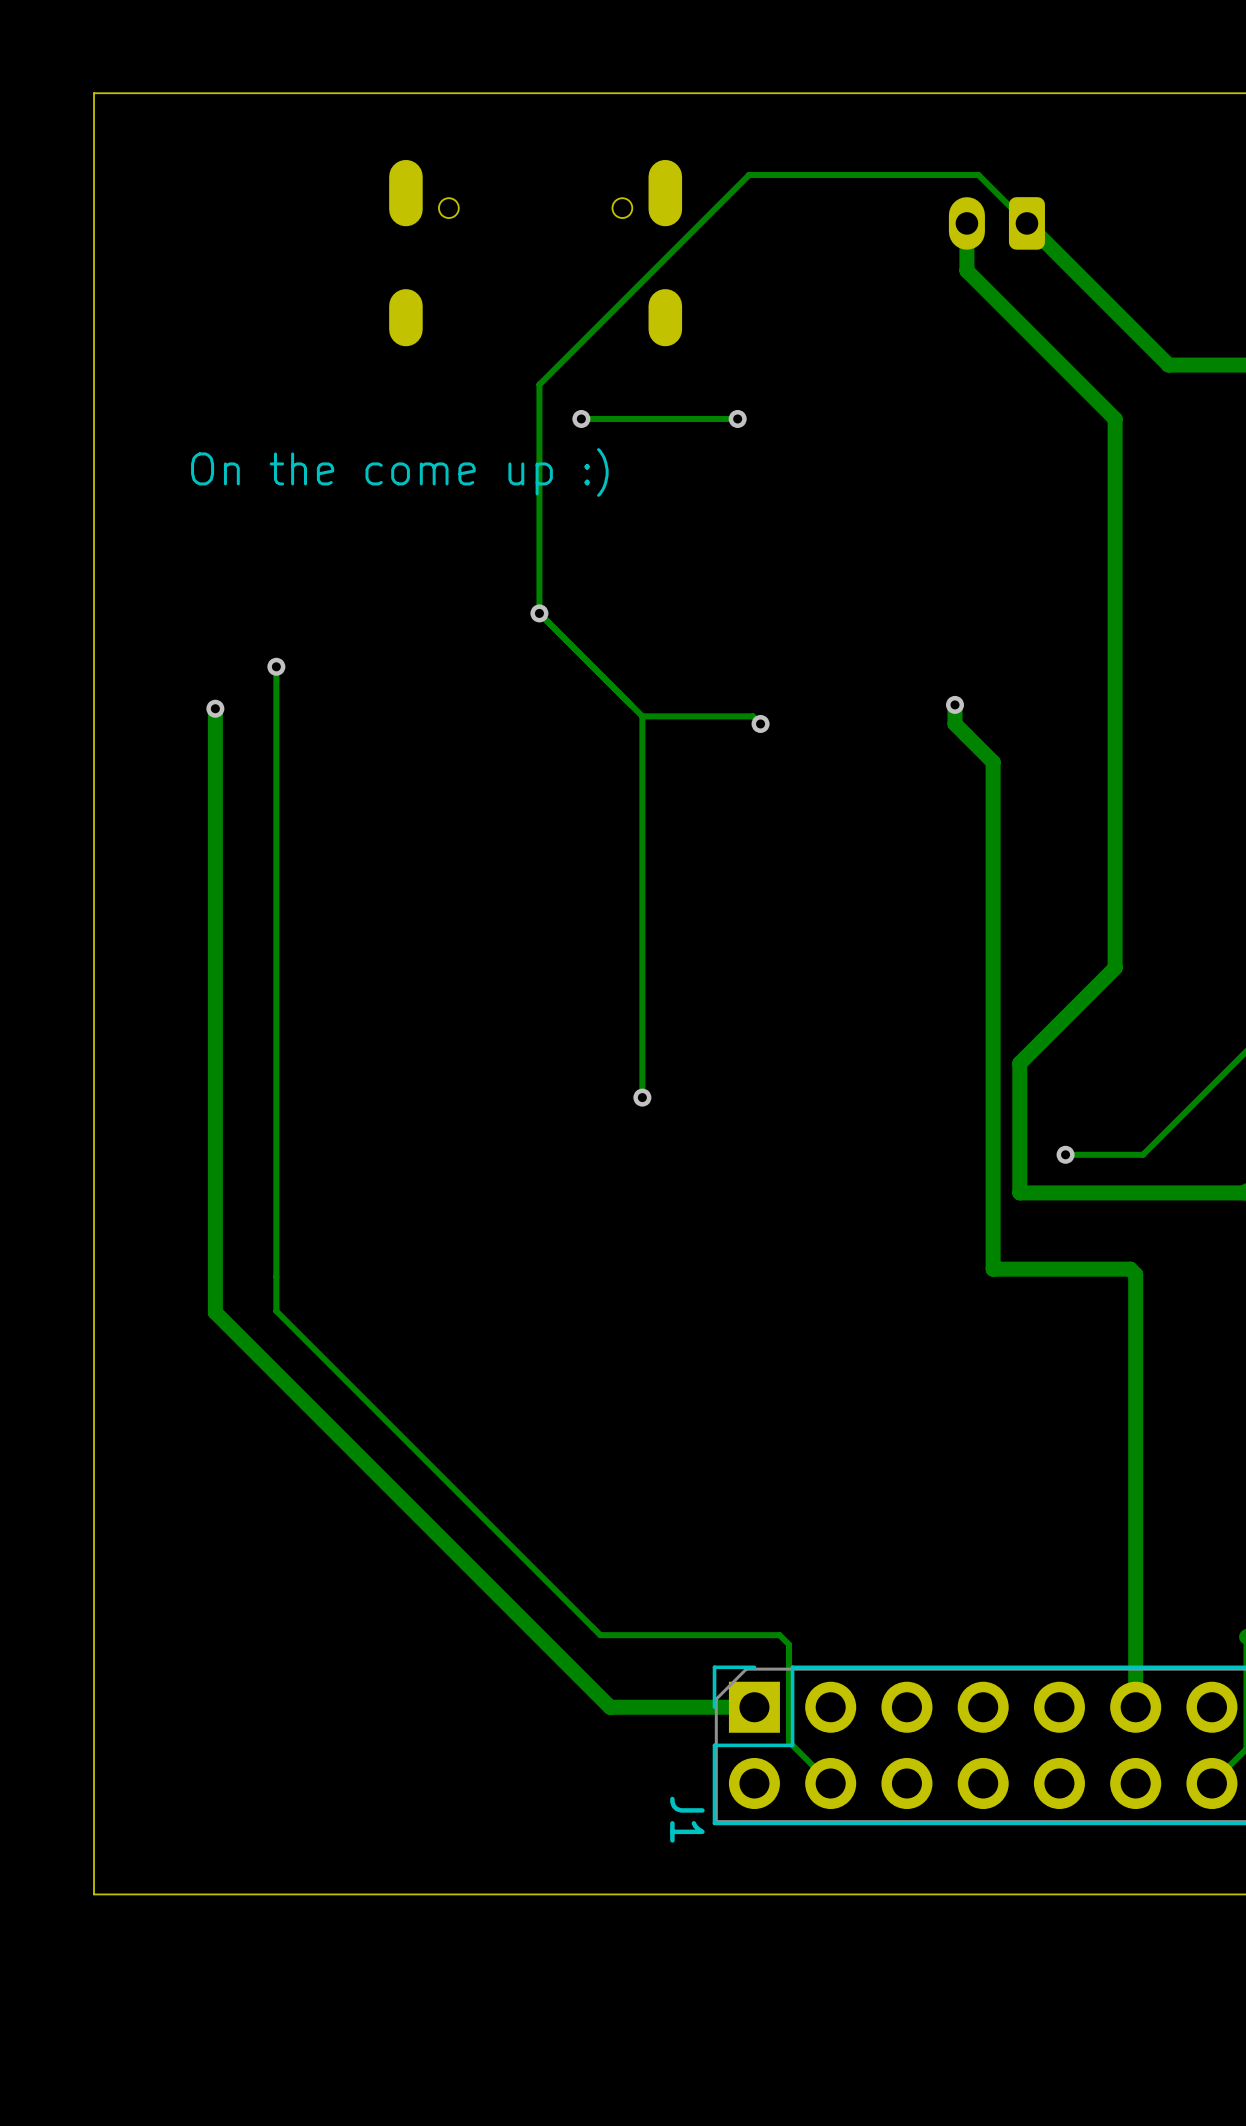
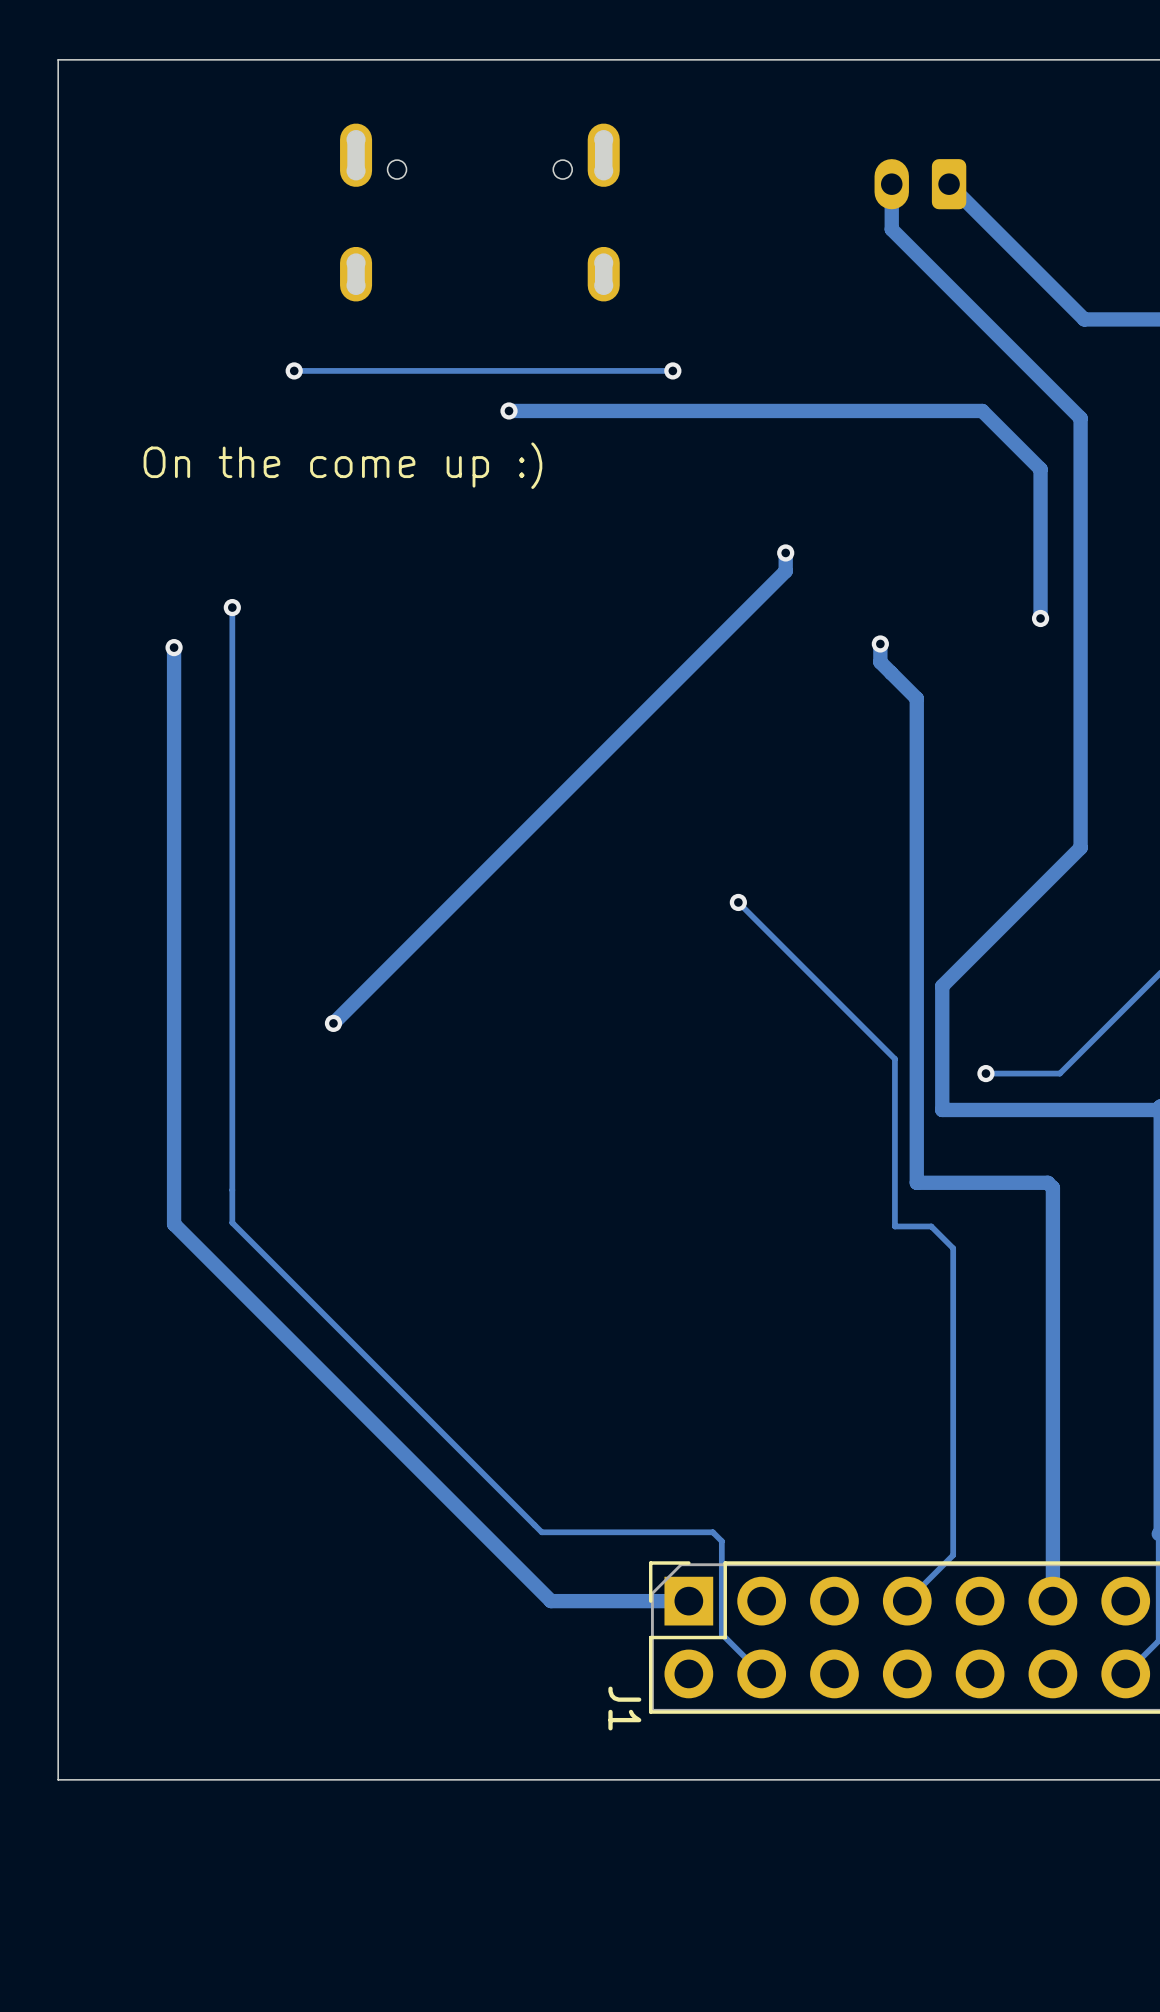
track: (1026, 223) (978, 174) (749, 174) (539, 384) (539, 613) (642, 716) -> none
via: none -> (294, 370)
track: none -> (523, 370) (294, 370)
via position: (581, 418) -> (509, 410)
track: (1115, 418) (1115, 967) -> (1033, 370) (1080, 418) (1080, 847) (1033, 895)
track: none -> (509, 410) (982, 410) (1040, 469) (1040, 618)
text position: On the come up :) (399, 472) -> On the come up :) (342, 465)
track: none -> (785, 552) (785, 571) (333, 1023)
via: none -> (785, 552)
via: (539, 613) -> none
via: none -> (1040, 618)
track: (642, 716) (642, 1097) -> none
track: (642, 716) (752, 716) (760, 723) -> none
via: (760, 723) -> none
track: none -> (738, 902) (894, 1059) (894, 1226) (931, 1226) (953, 1248) (953, 1555) (907, 1601)
via: none -> (738, 902)
via: (642, 1097) -> none
via: none -> (333, 1023)

